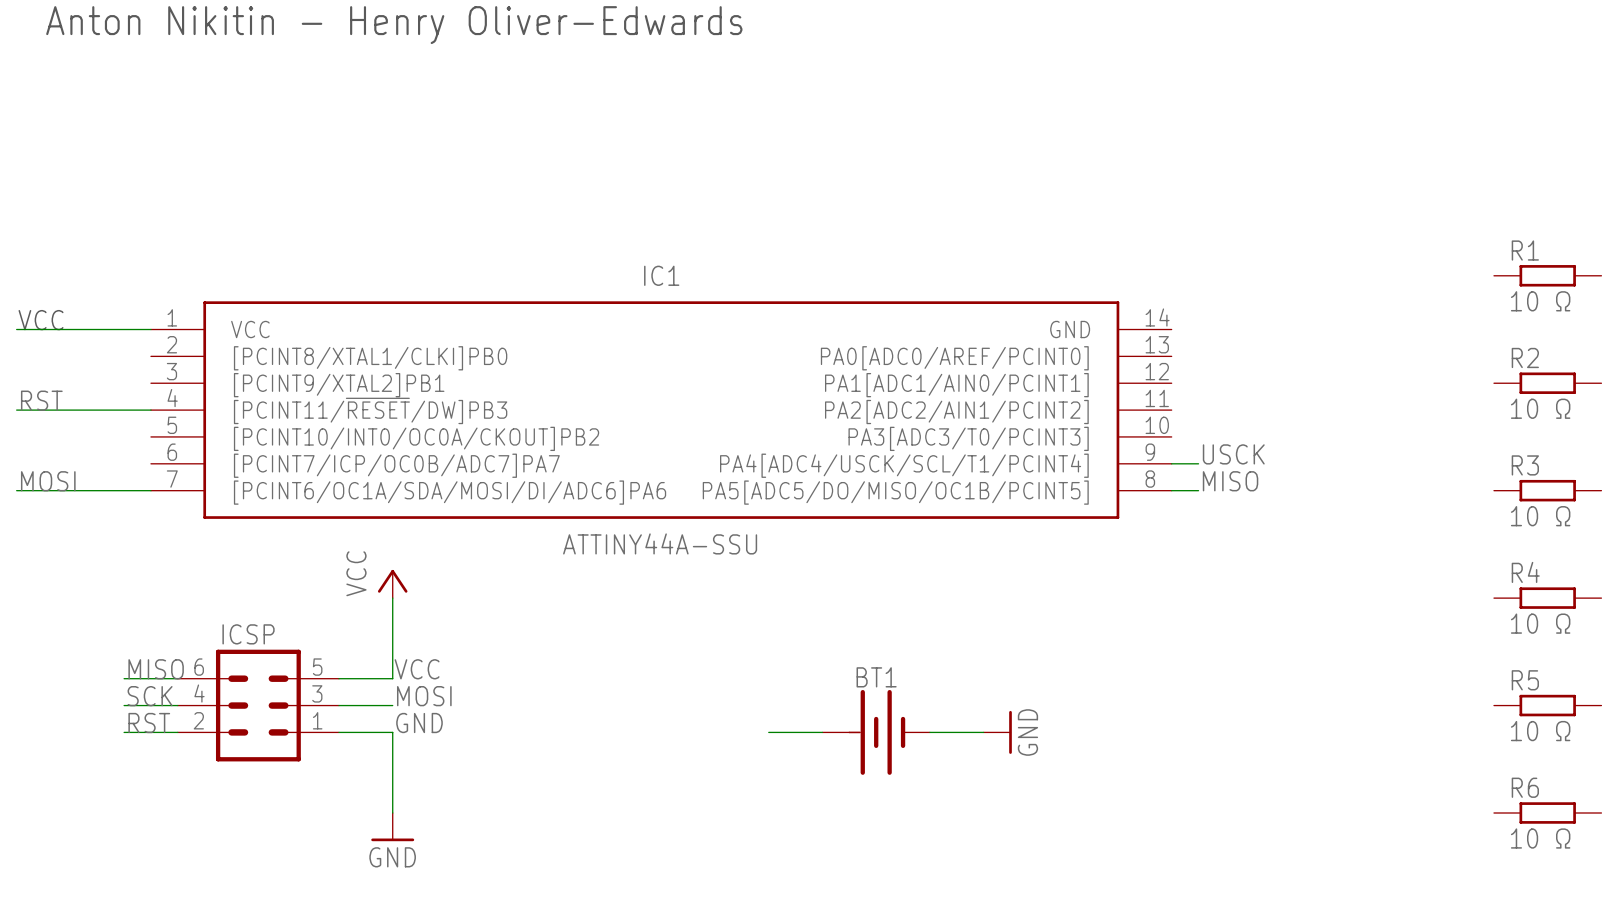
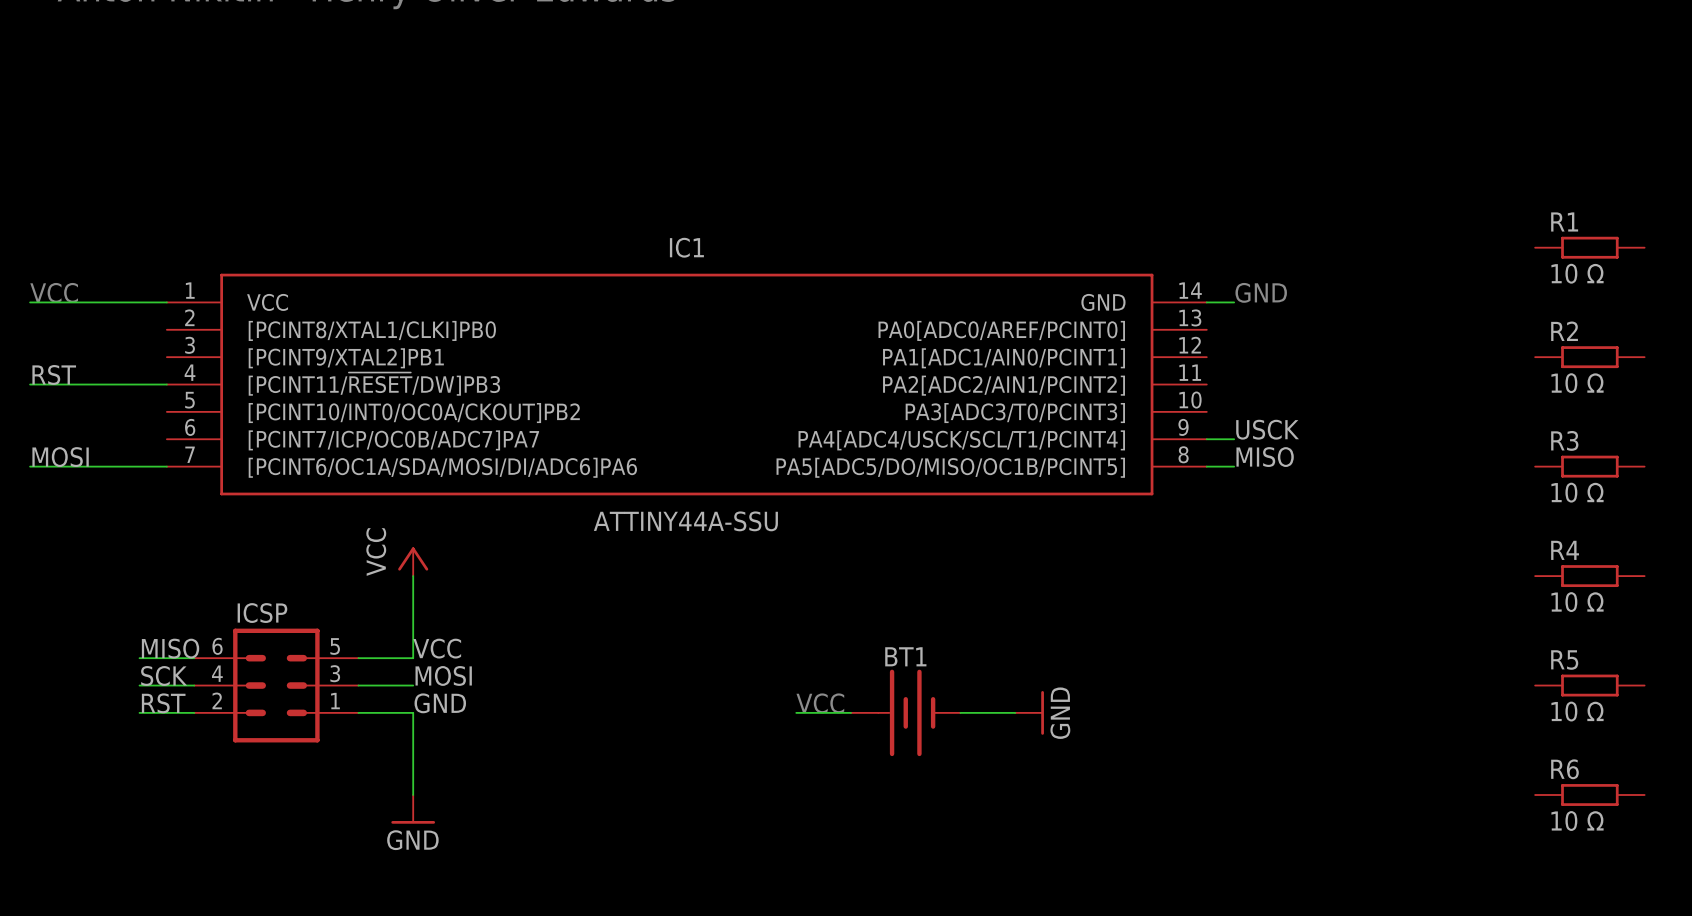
text: none -> GND (1261, 292)
wire: none -> (1206, 302) (1234, 302)
text: none -> VCC (820, 703)

